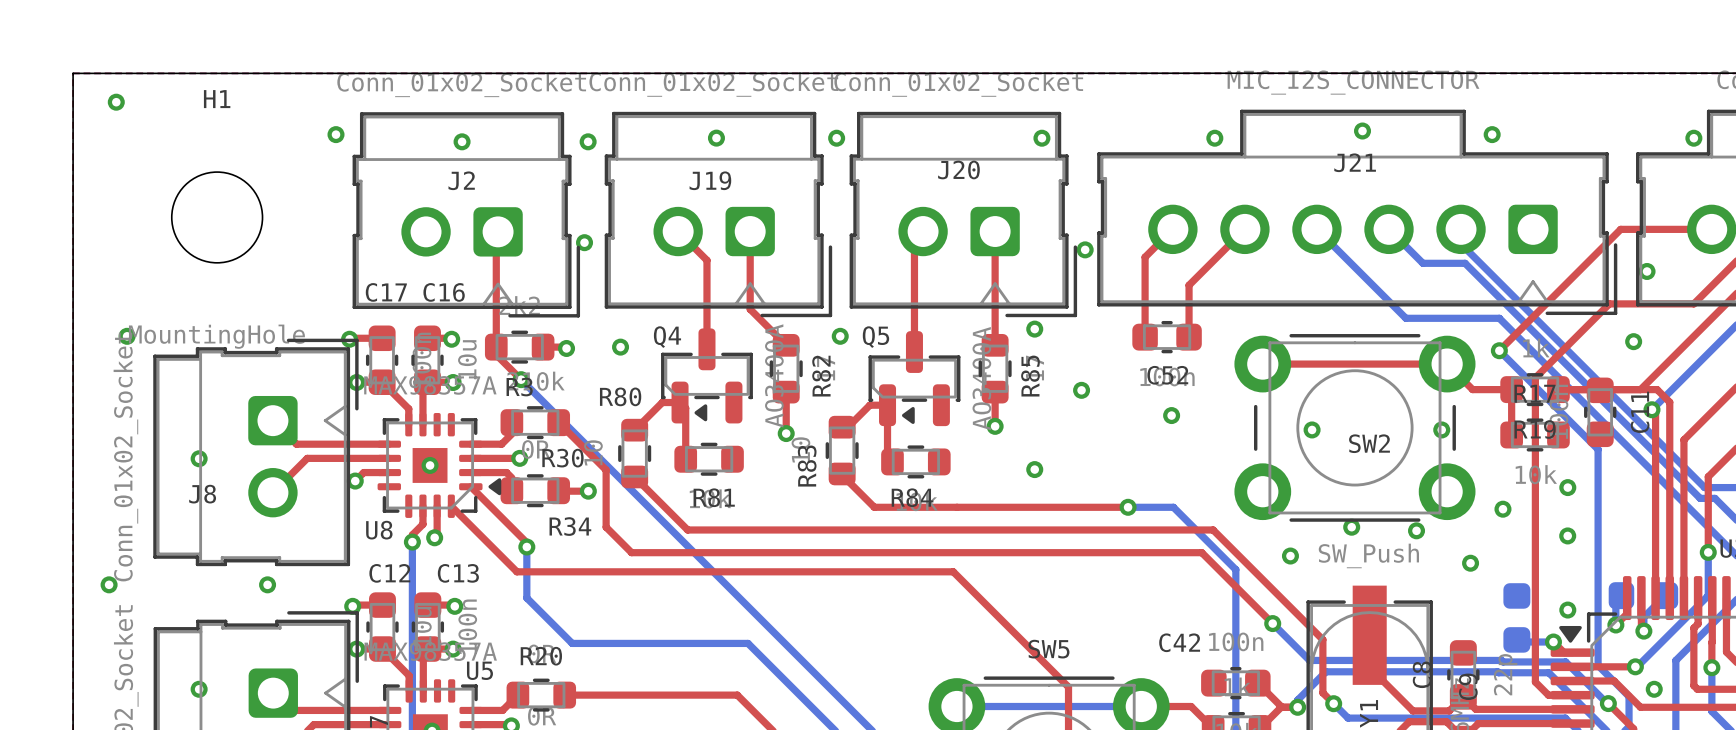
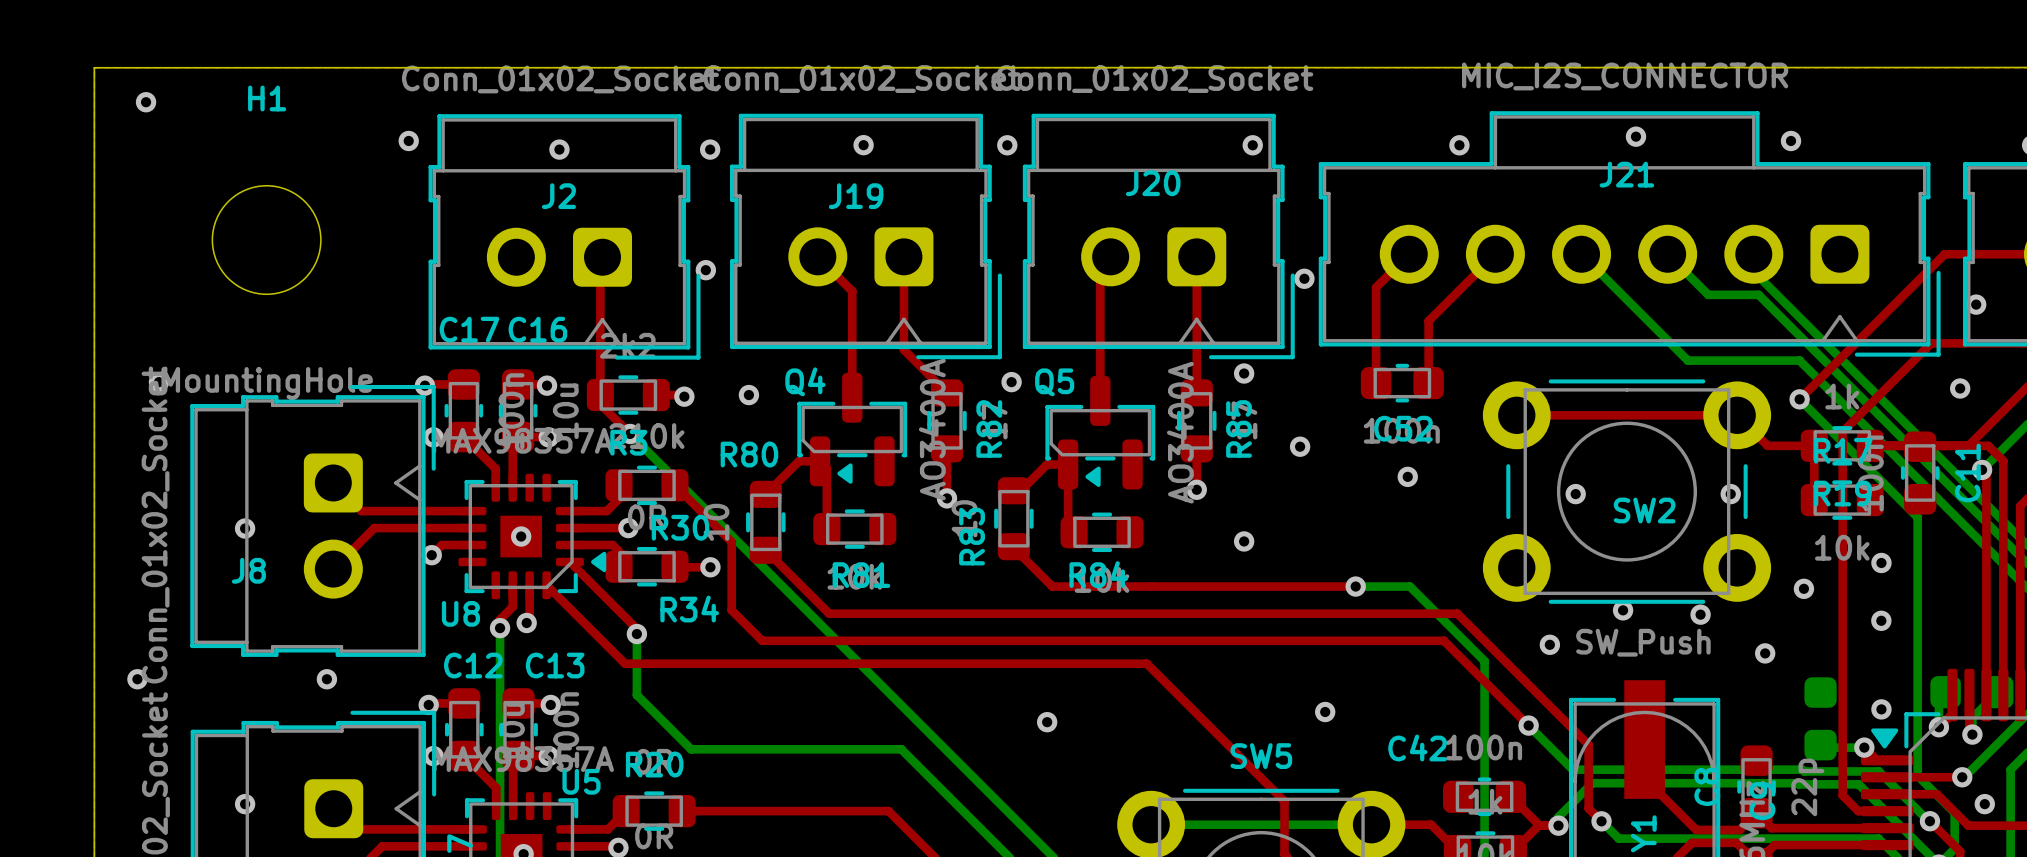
via: none -> (1325, 712)
via: none -> (1047, 722)

